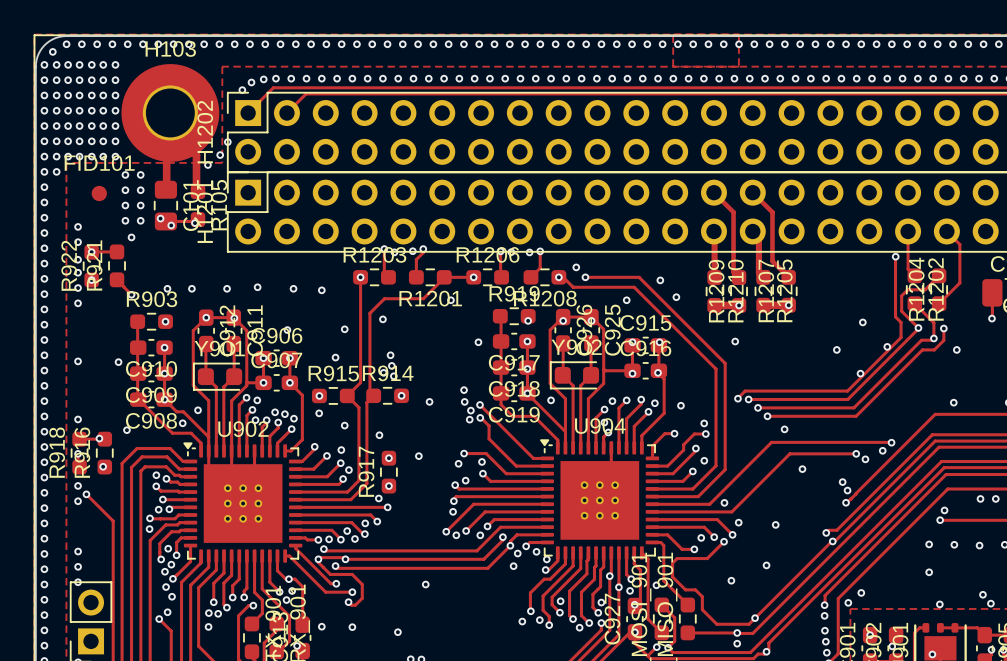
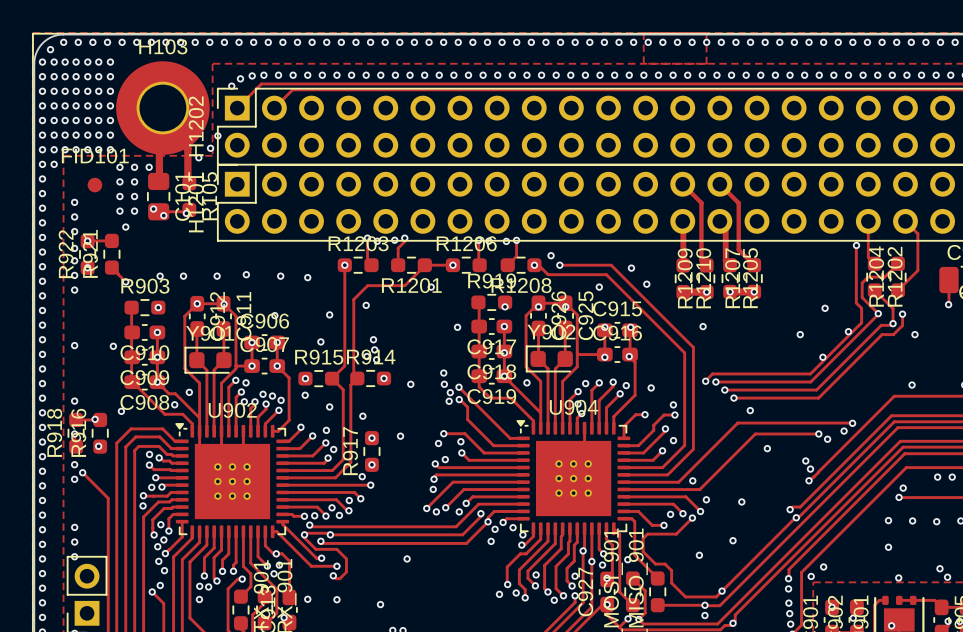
via: none -> (149, 167)
via: none -> (74, 202)
via: none -> (730, 291)

